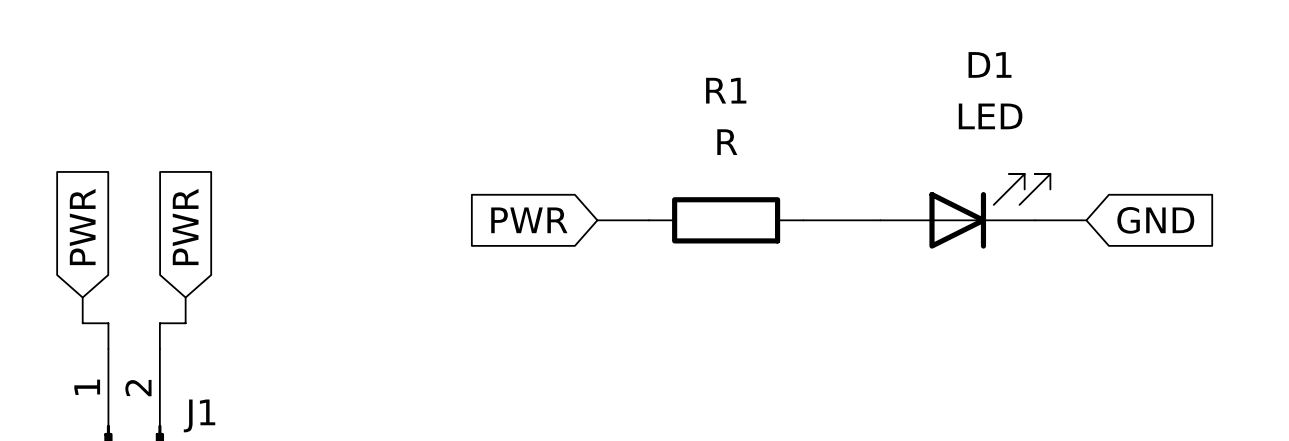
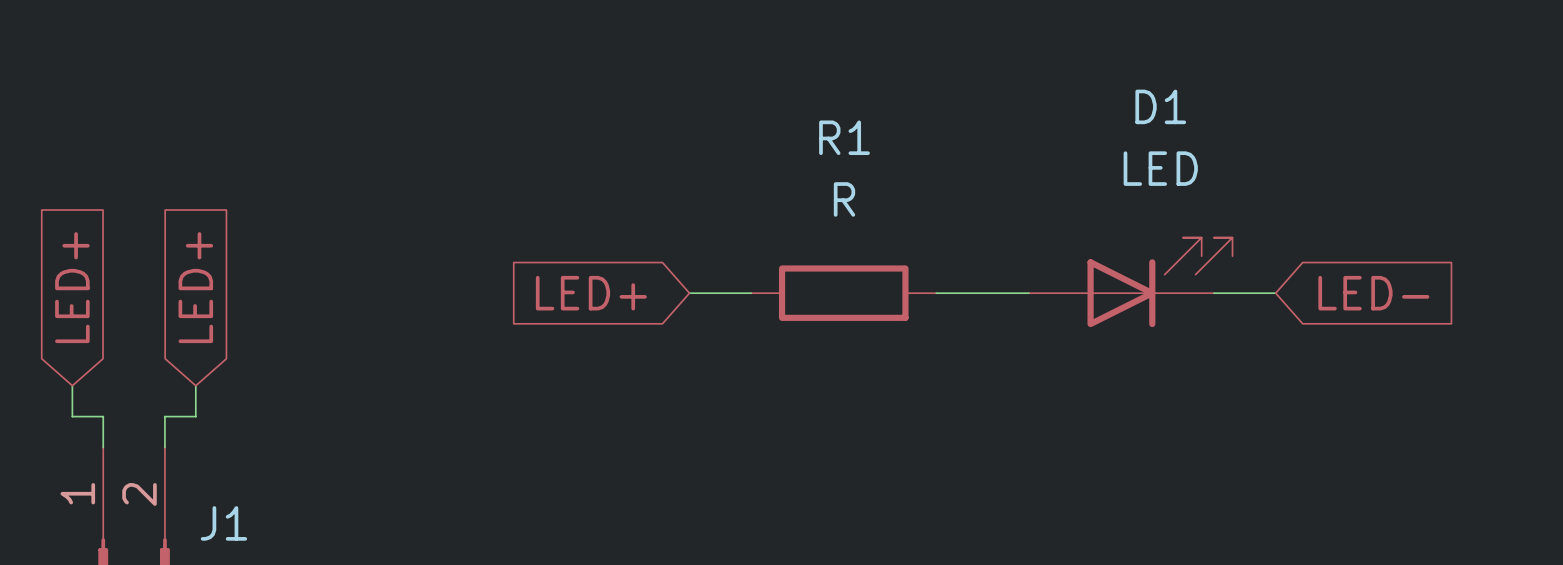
global label: PWR (529, 220) -> LED+ (591, 293)
global label: GND (1155, 220) -> LED- (1373, 293)
global label: PWR (82, 227) -> LED+ (72, 287)
global label: PWR (185, 227) -> LED+ (195, 287)

